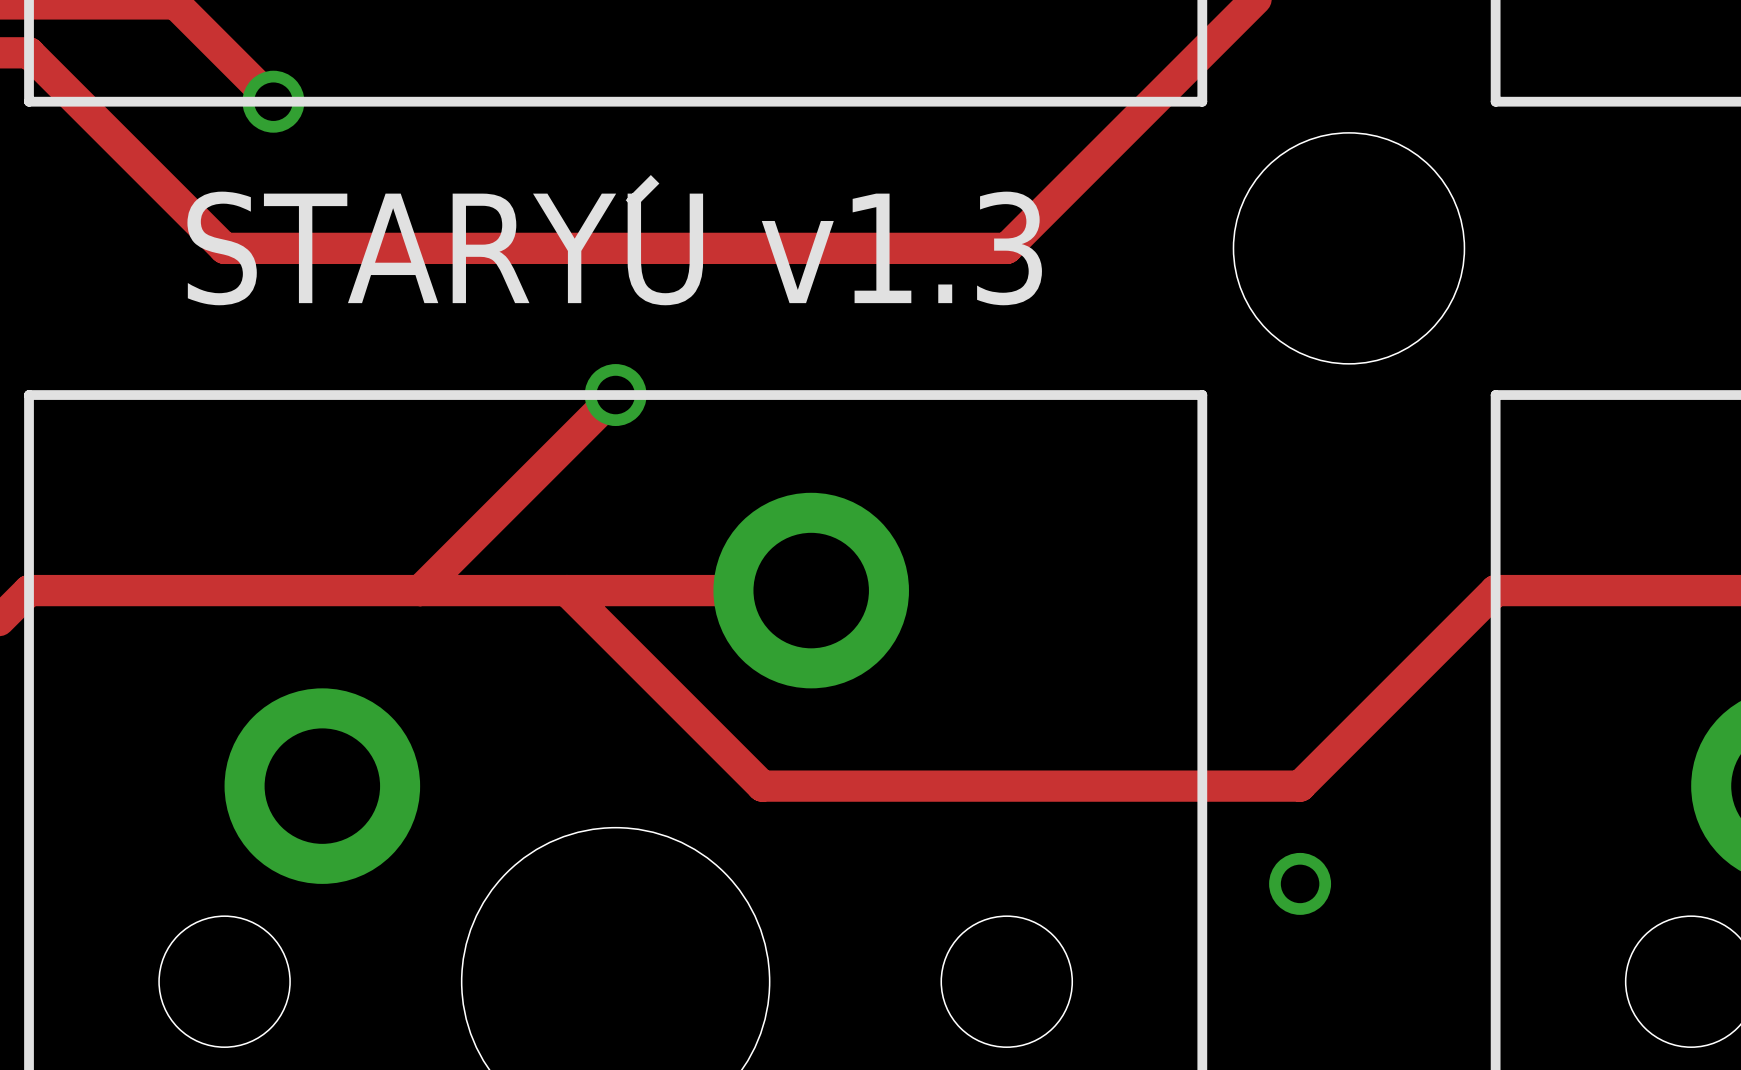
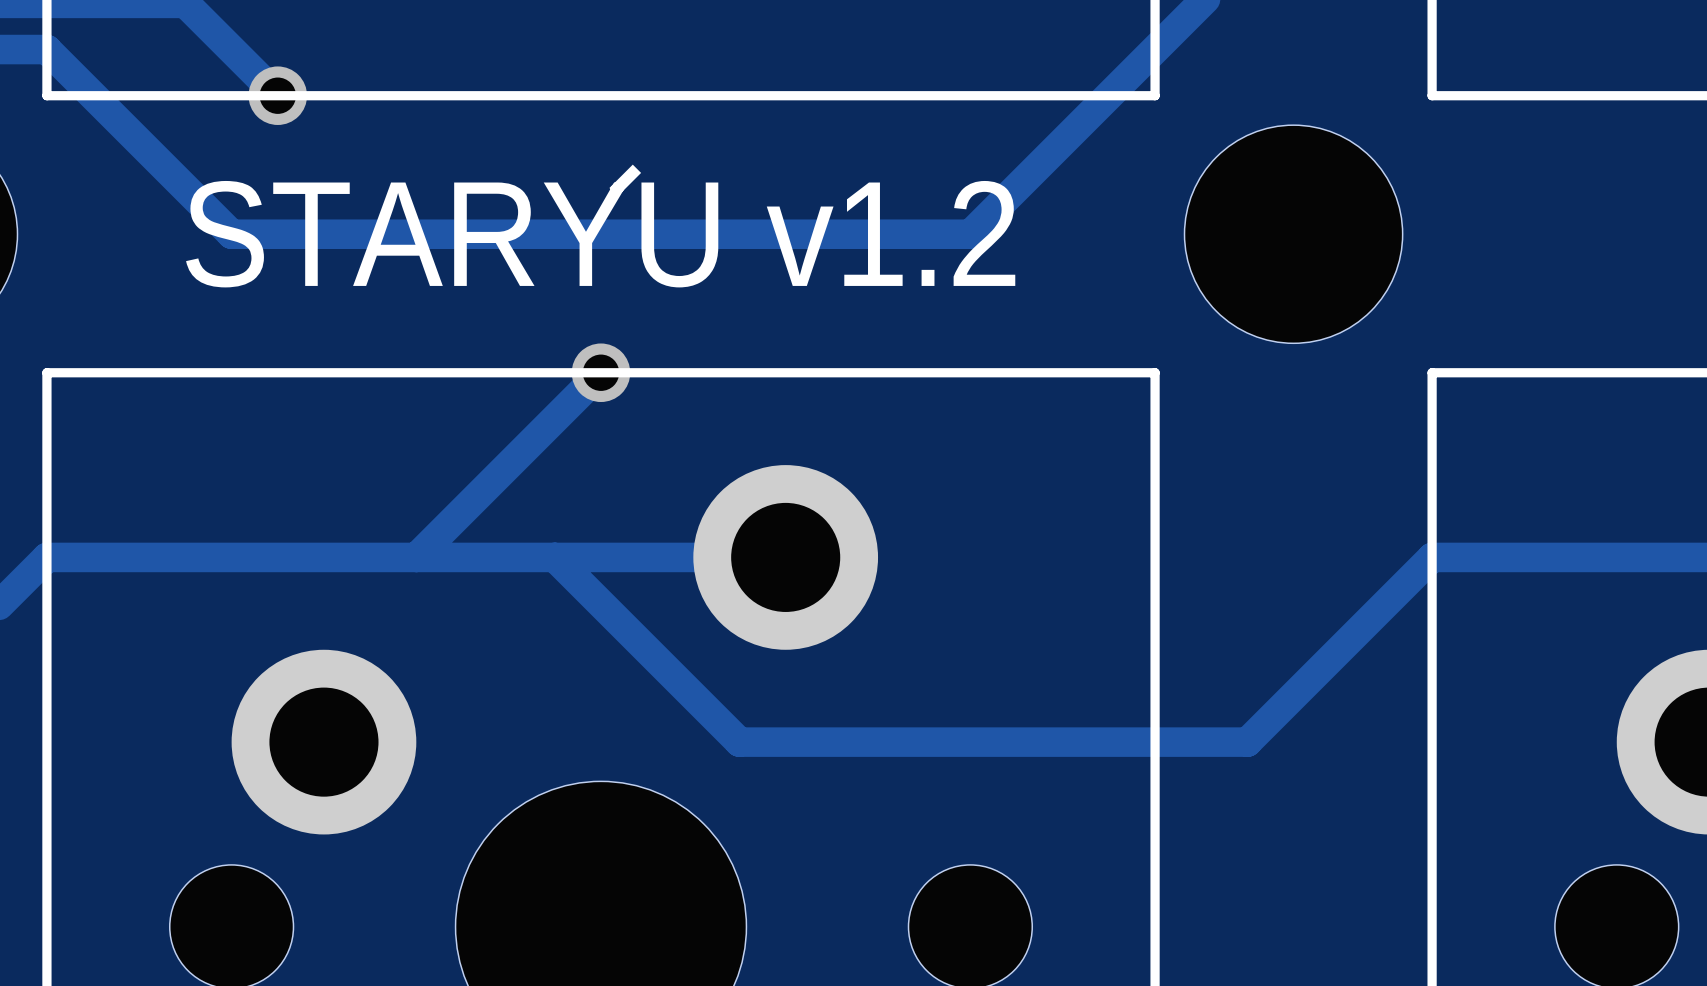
text: STARYU v1.3 (614, 248) -> STARYU v1.2 (600, 234)
via: (1300, 883) -> none

